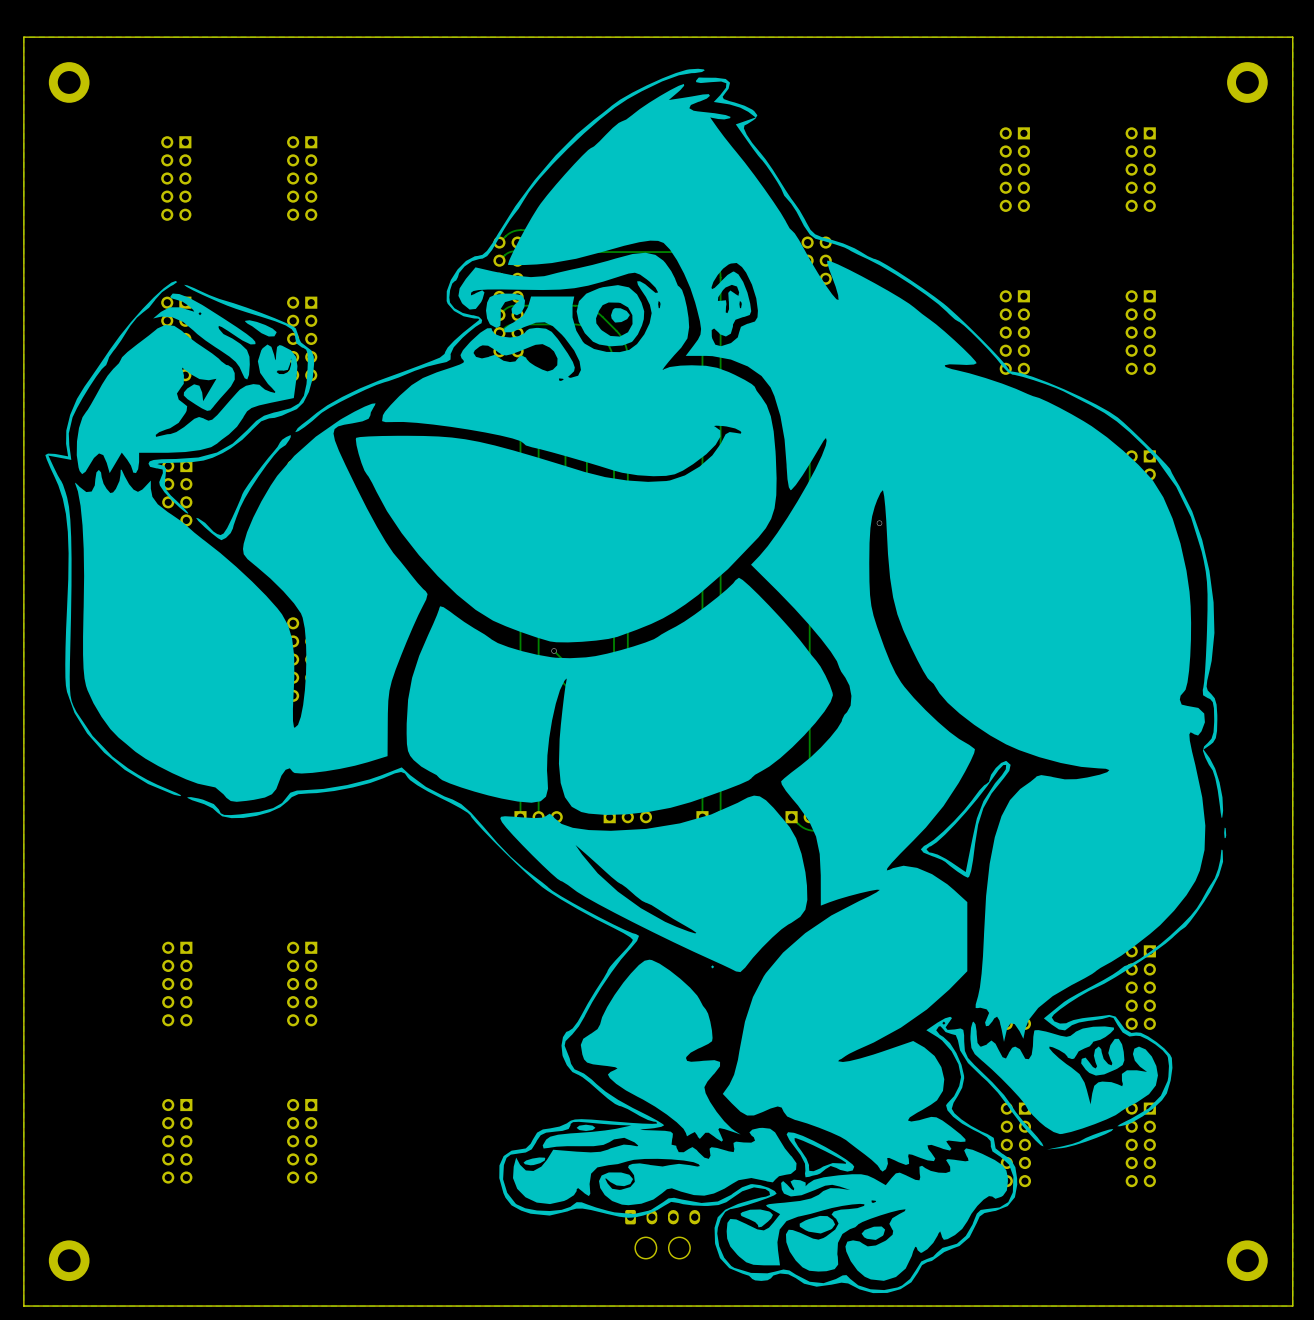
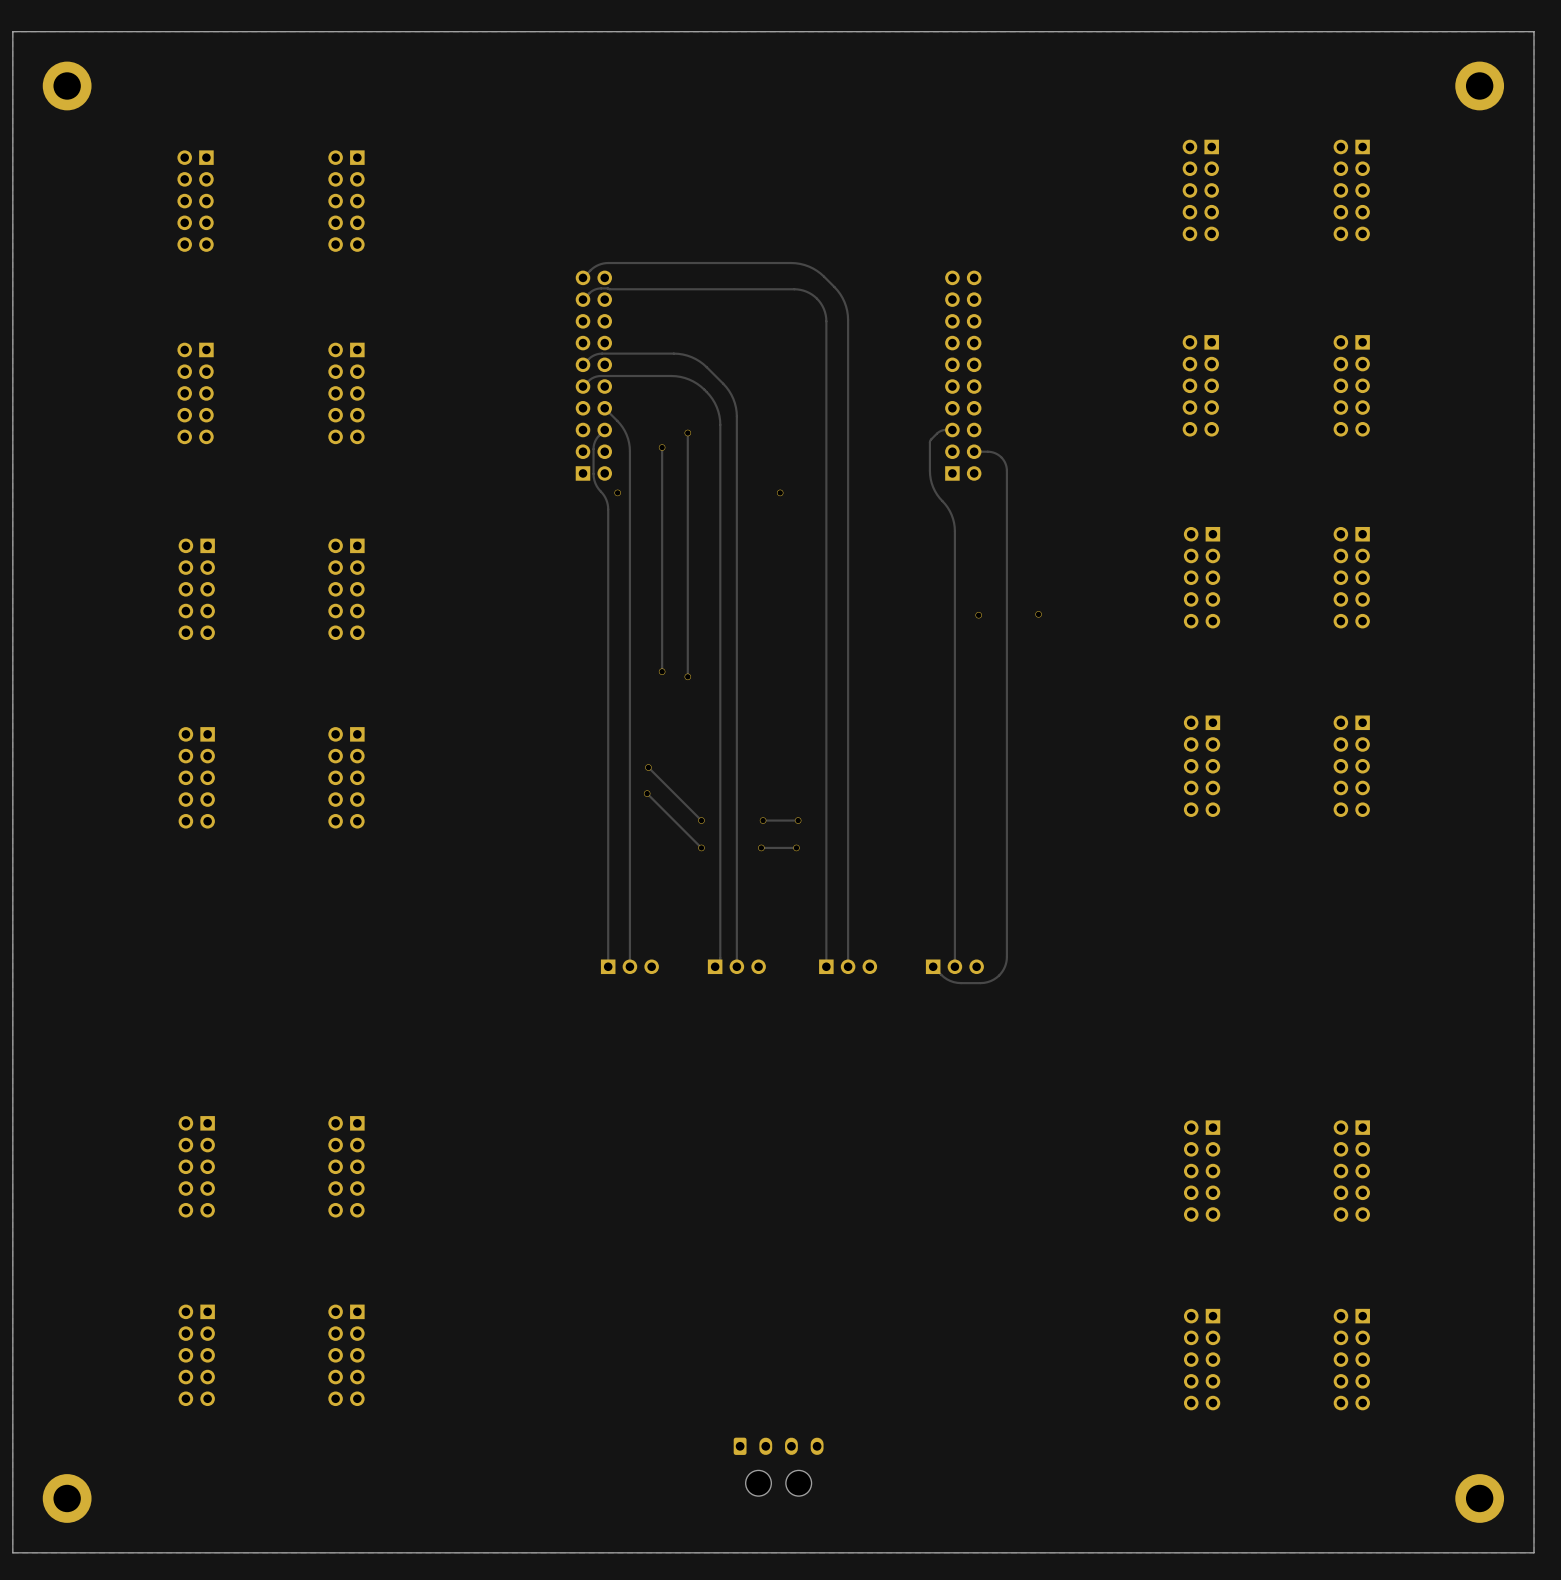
drawing: [45, 68, 1227, 1294] -> none

